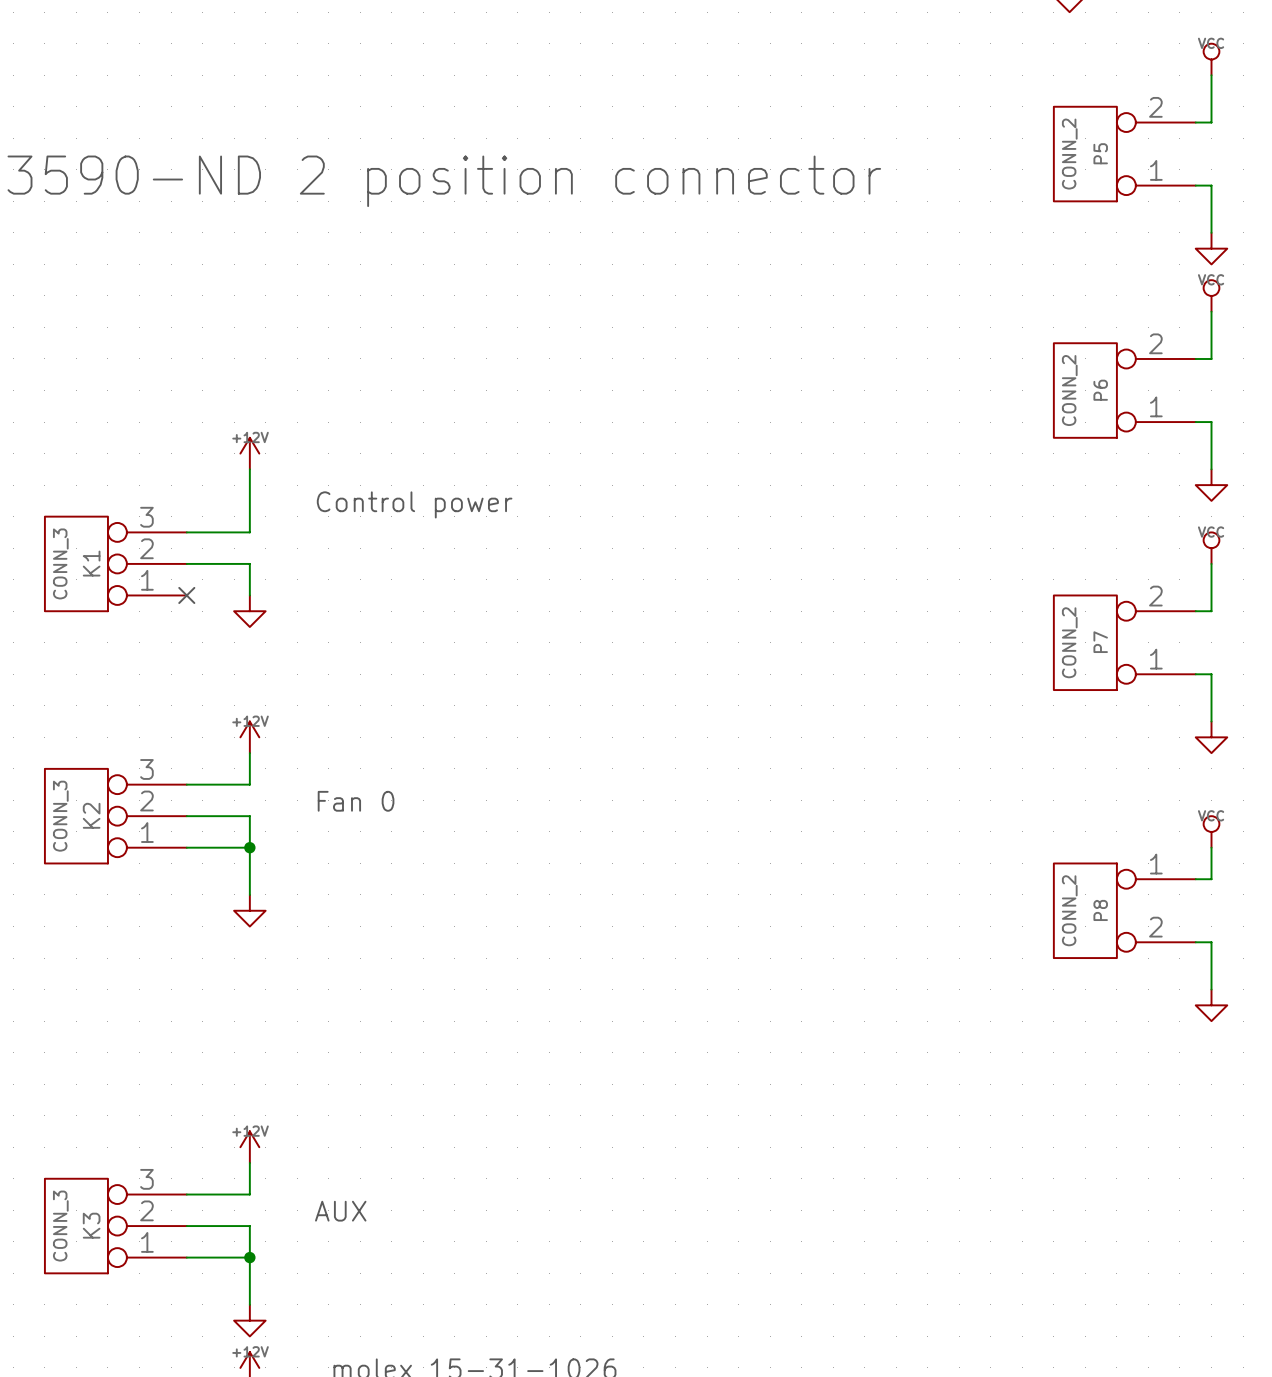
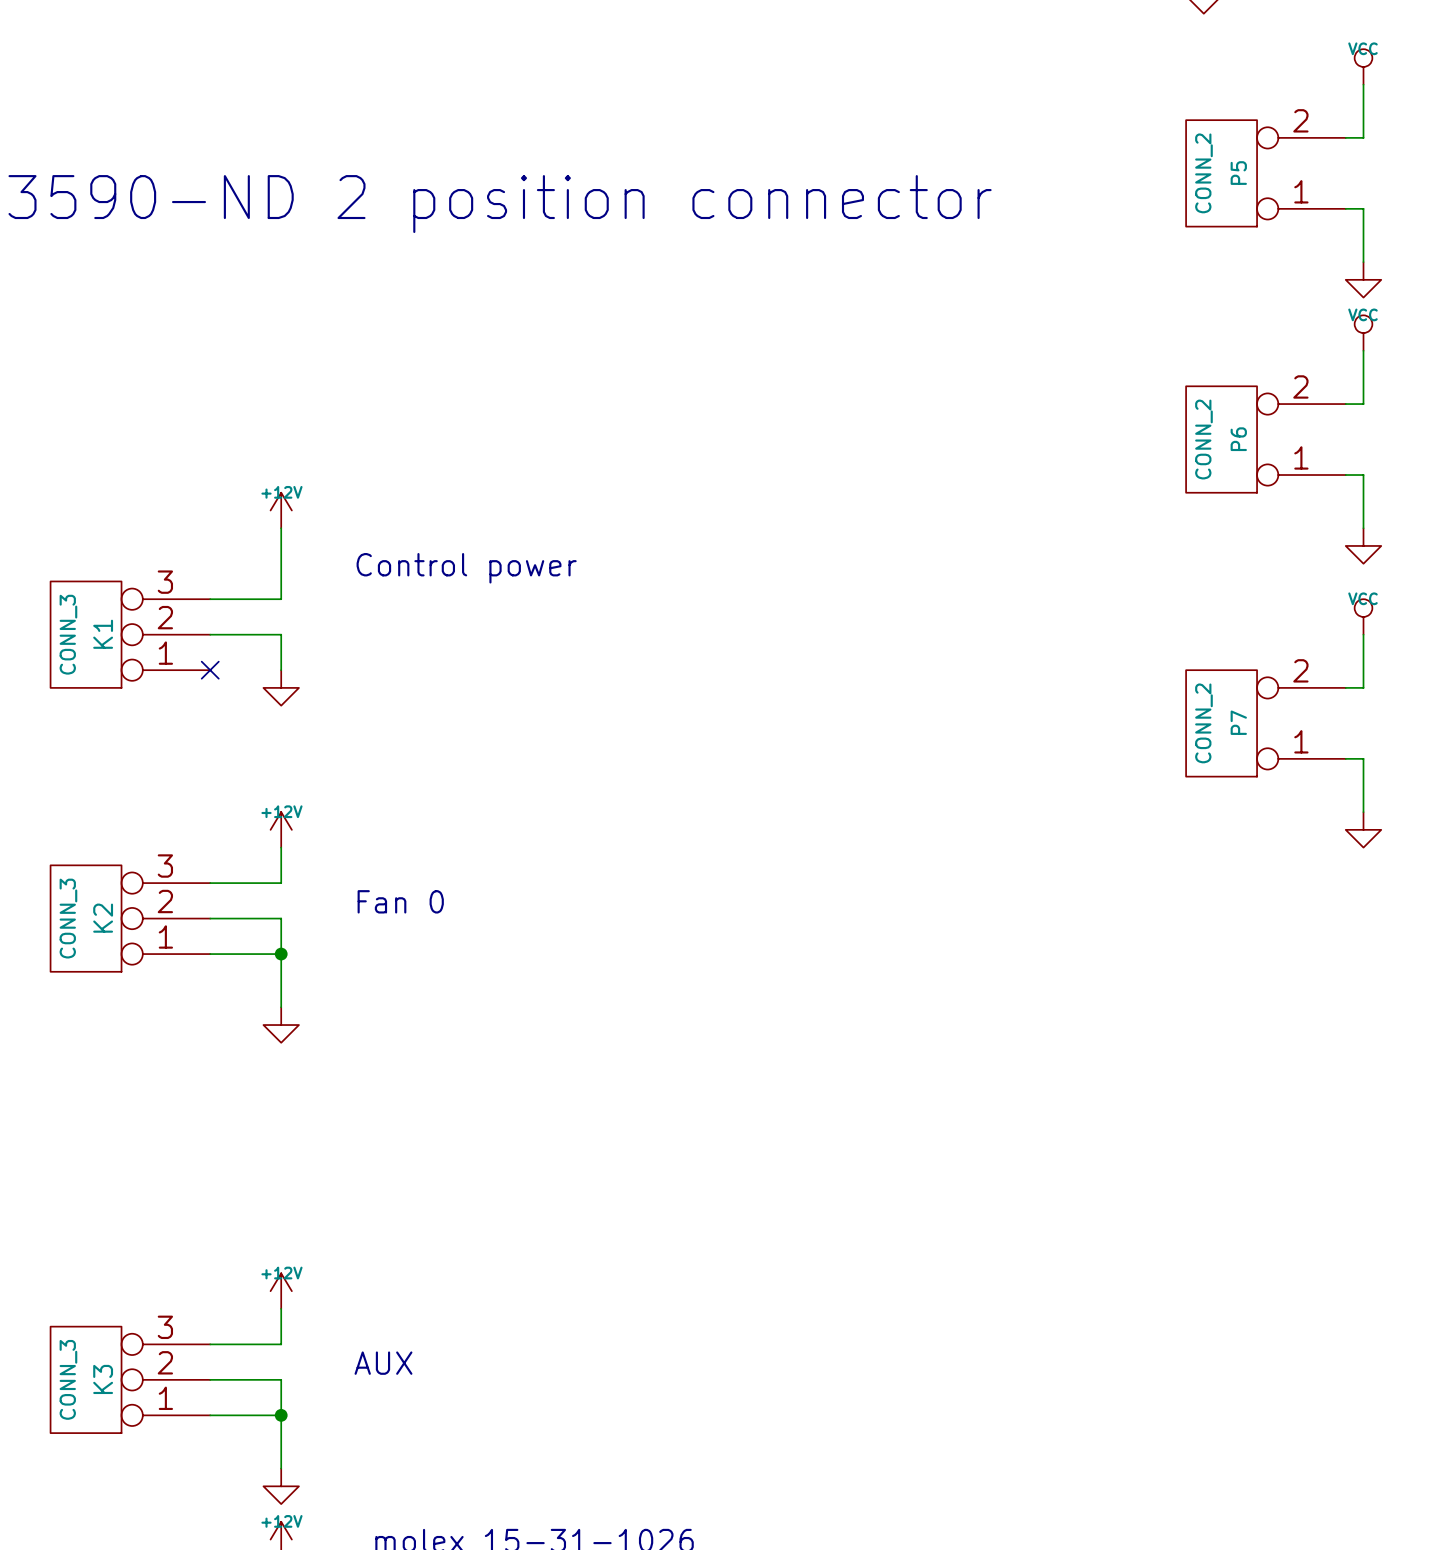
power symbol: VCC (1211, 831) -> none
wire: (1211, 847) (1211, 879) (1195, 879) -> none
P8: CONN_2 (1124, 910) -> none
wire: (1195, 942) (1211, 942) (1211, 989) -> none
power symbol: (1211, 1005) -> none

